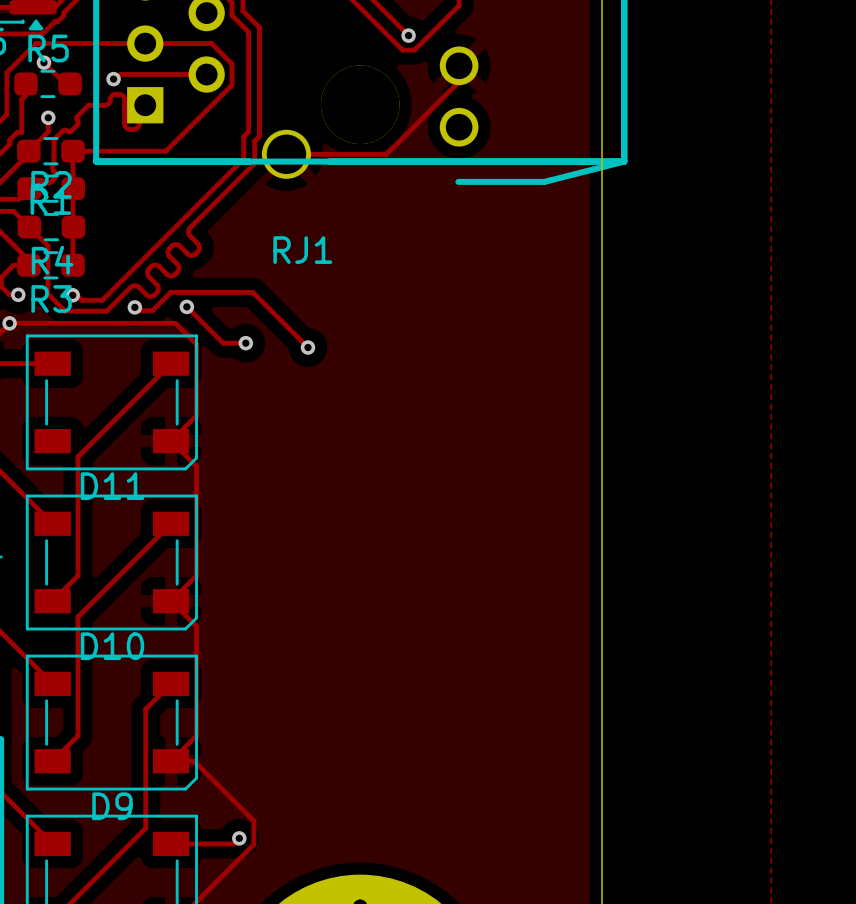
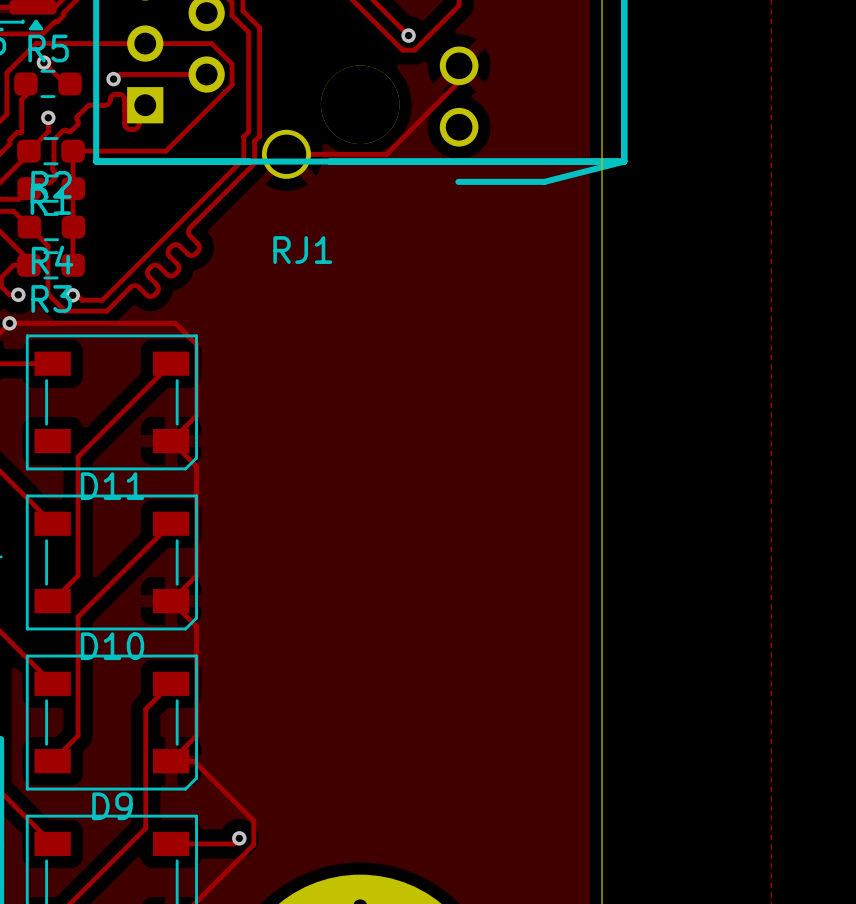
track: (134, 305) (138, 310) (152, 310) (170, 292) (252, 292) (307, 347) -> none
track: (186, 306) (223, 343) (245, 343) -> none
via: (186, 306) -> none
via: (134, 307) -> none
via: (245, 343) -> none
via: (307, 347) -> none

